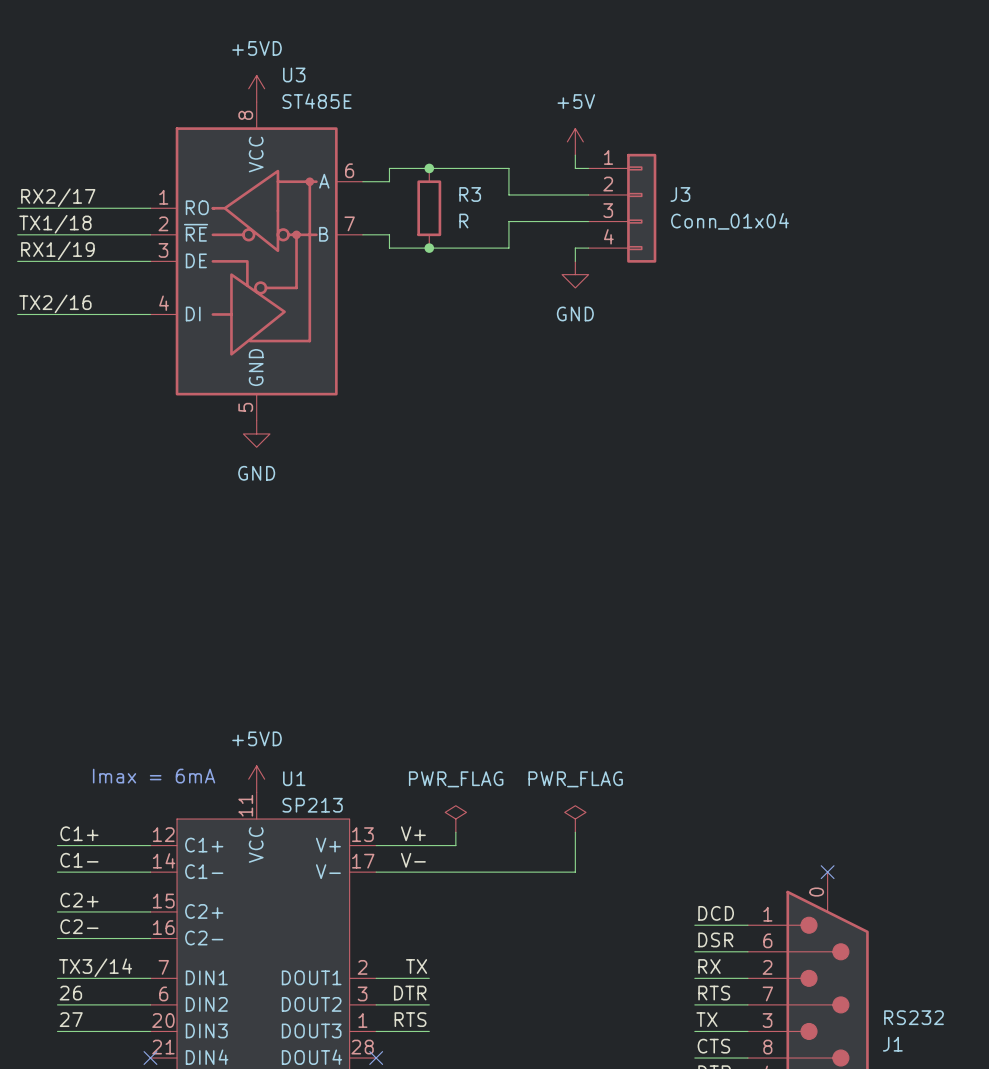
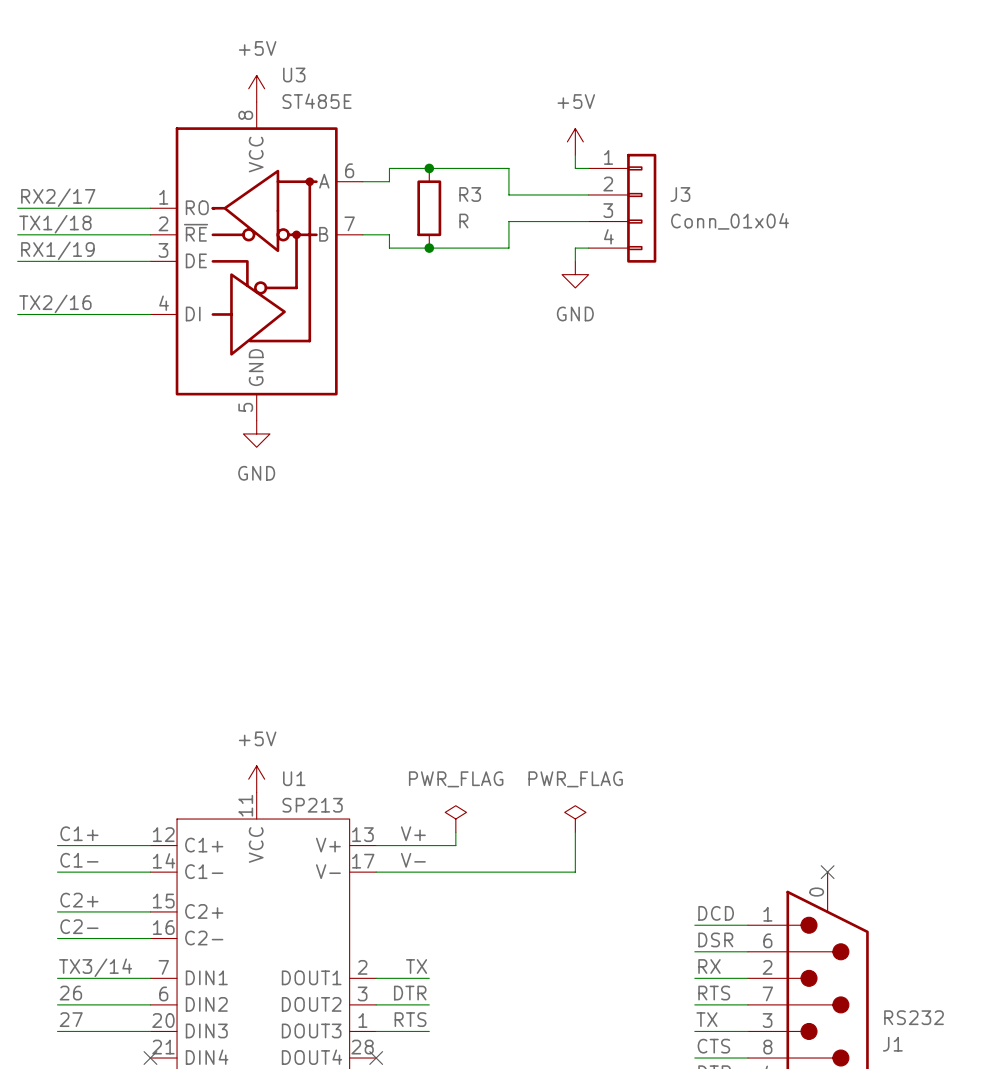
power symbol: +5VD (256, 88) -> +5V (256, 88)
text: Imax = 6mA (154, 776) -> none
power symbol: +5VD (256, 779) -> +5V (256, 779)

